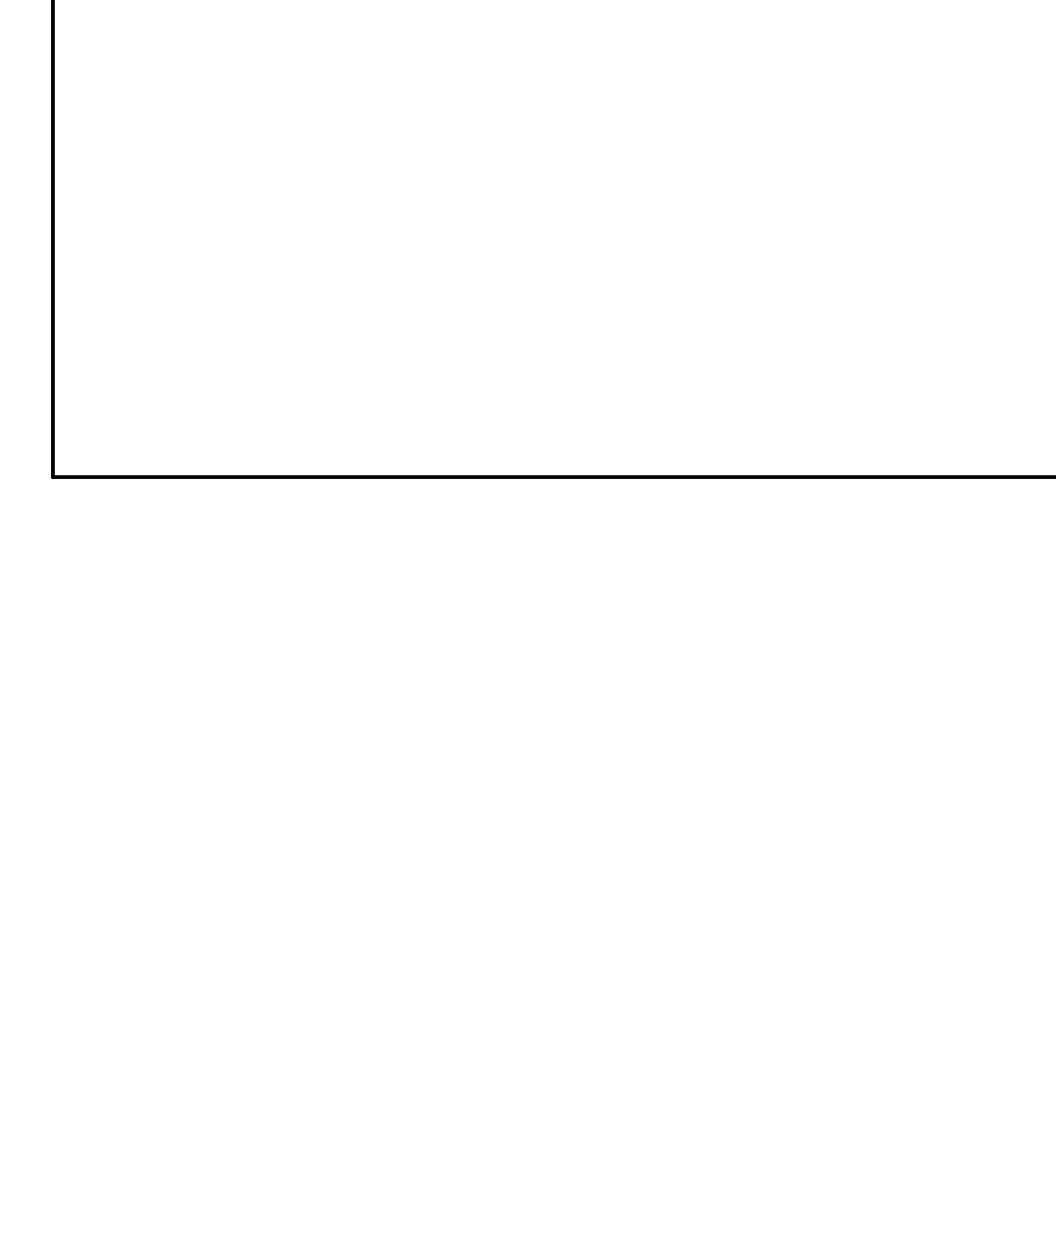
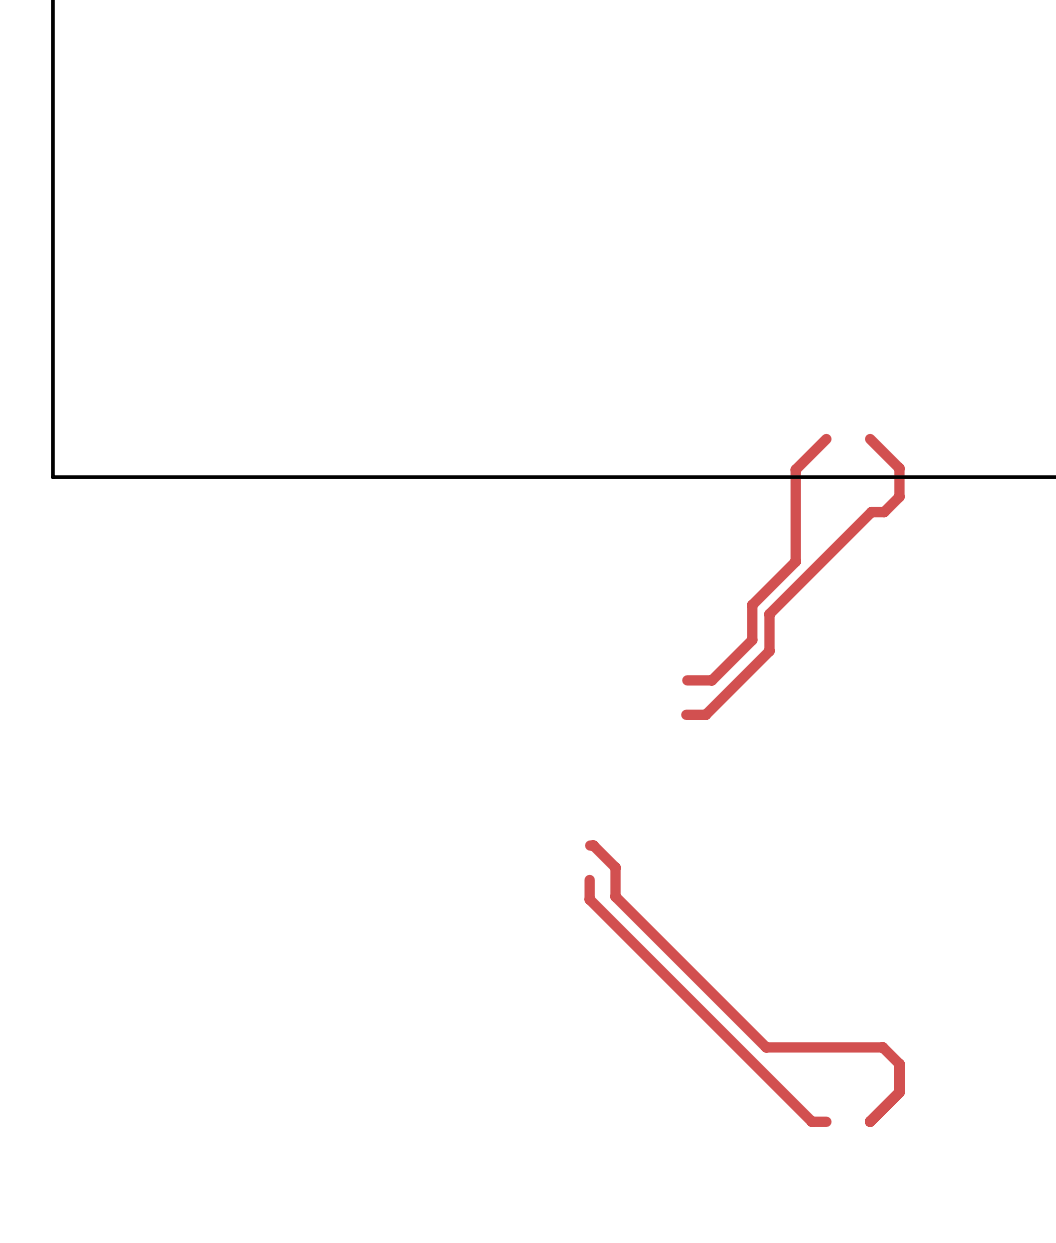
track: none -> (826, 439) (795, 469) (795, 561) (752, 605) (752, 640) (711, 680) (687, 680)
track: none -> (870, 439) (899, 468) (899, 496) (884, 512) (871, 512) (769, 614) (769, 651) (705, 714) (686, 714)
track: none -> (590, 845) (593, 845) (615, 867) (615, 896) (766, 1047) (882, 1047) (899, 1063) (899, 1092) (870, 1121)
track: none -> (589, 880) (589, 899) (811, 1121) (826, 1121)

